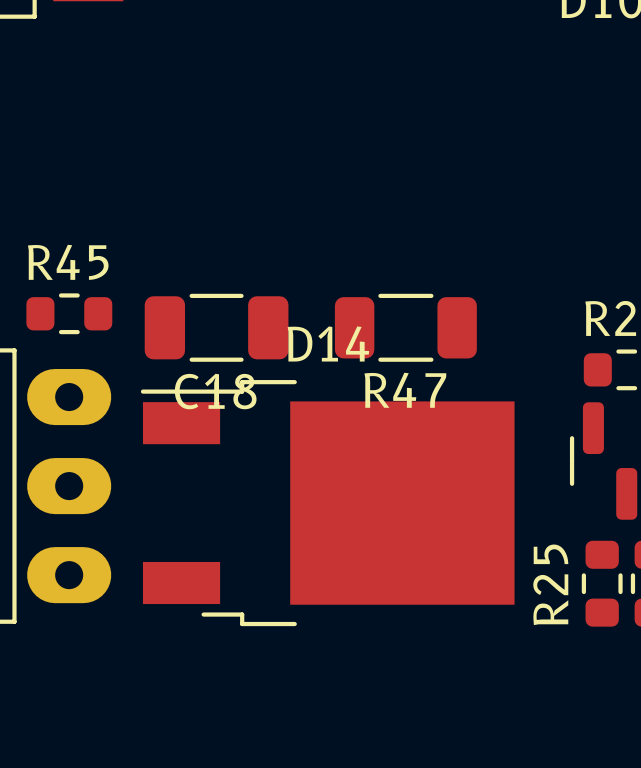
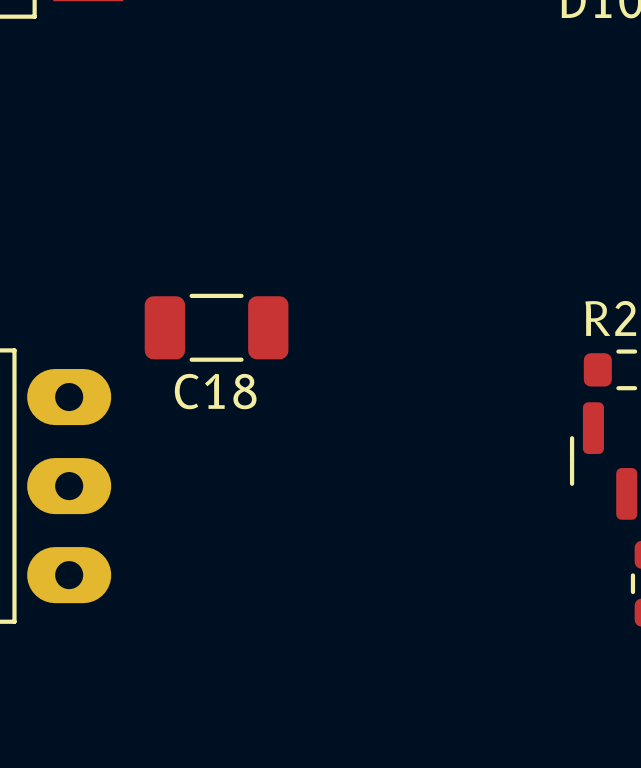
R45: (69, 313) -> none
R47: (405, 327) -> none
D14: (327, 503) -> none
R25: (602, 583) -> none

